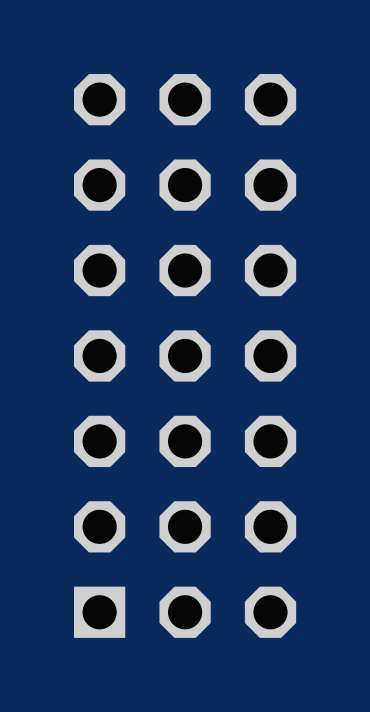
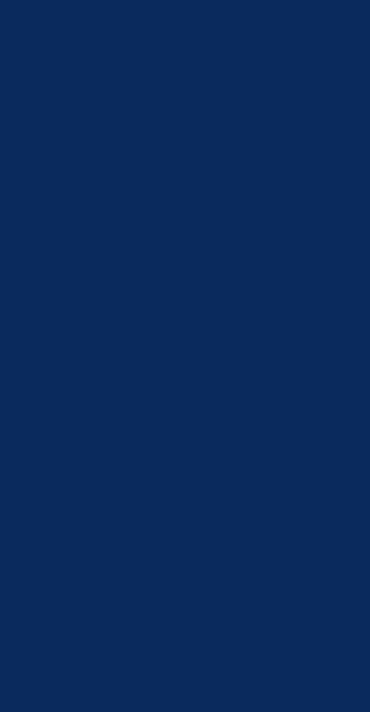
part: (99, 355) -> none
part: (227, 355) -> none

